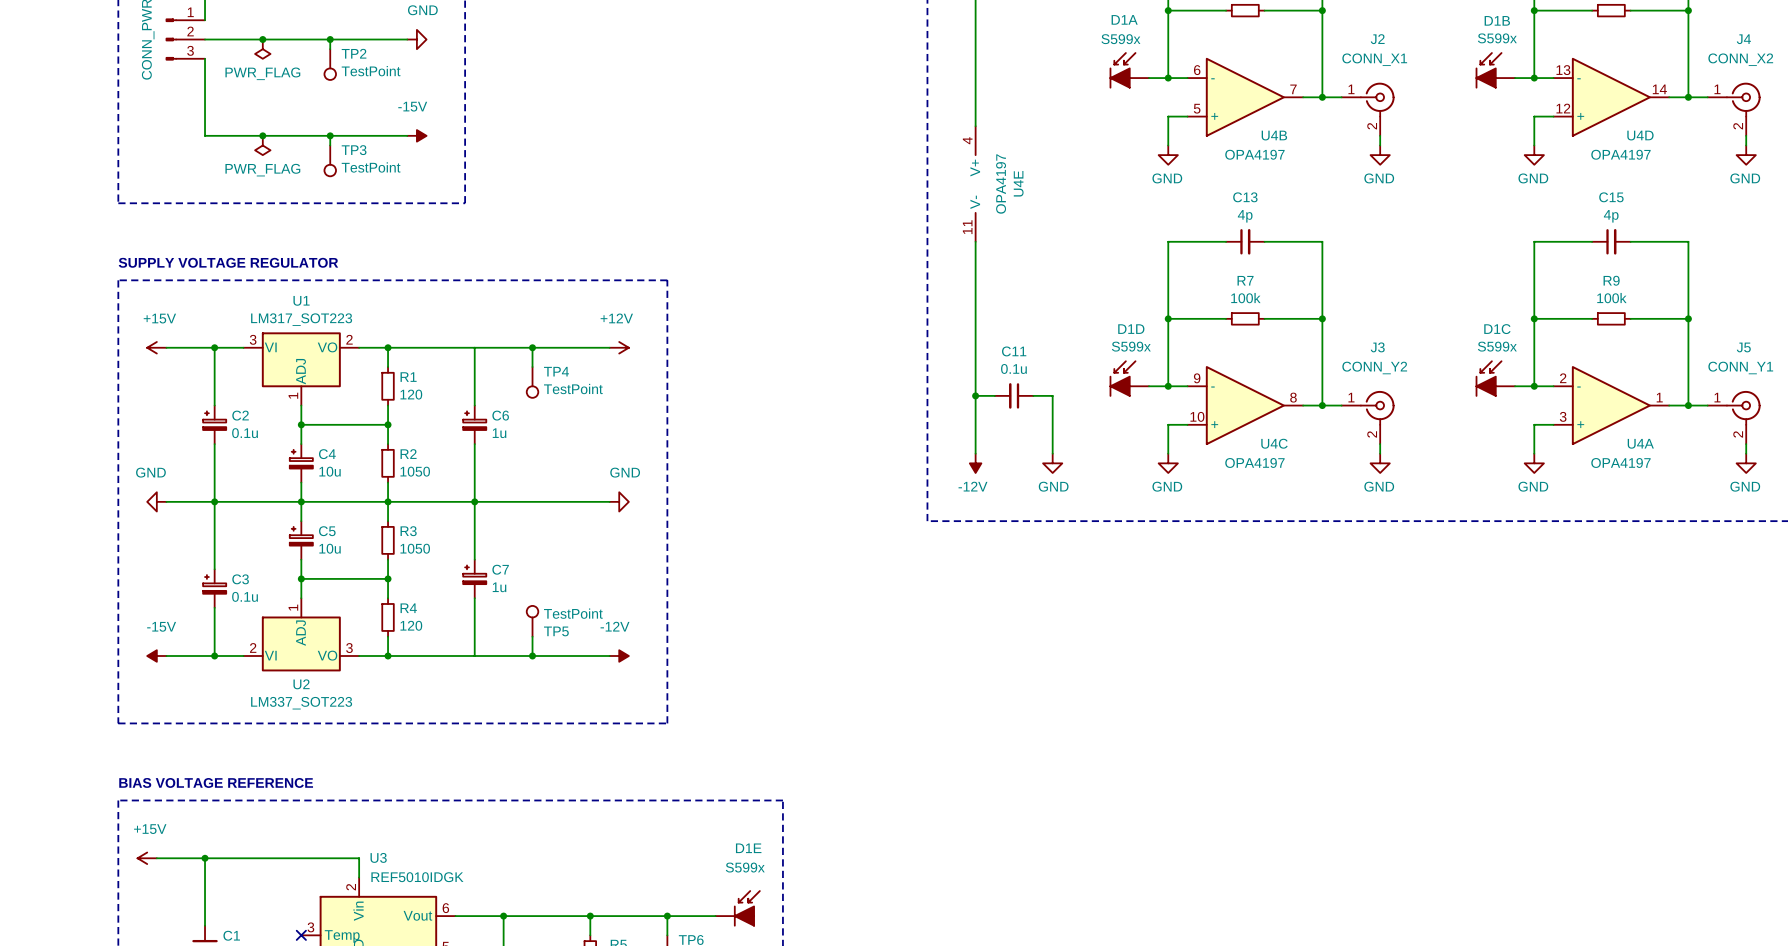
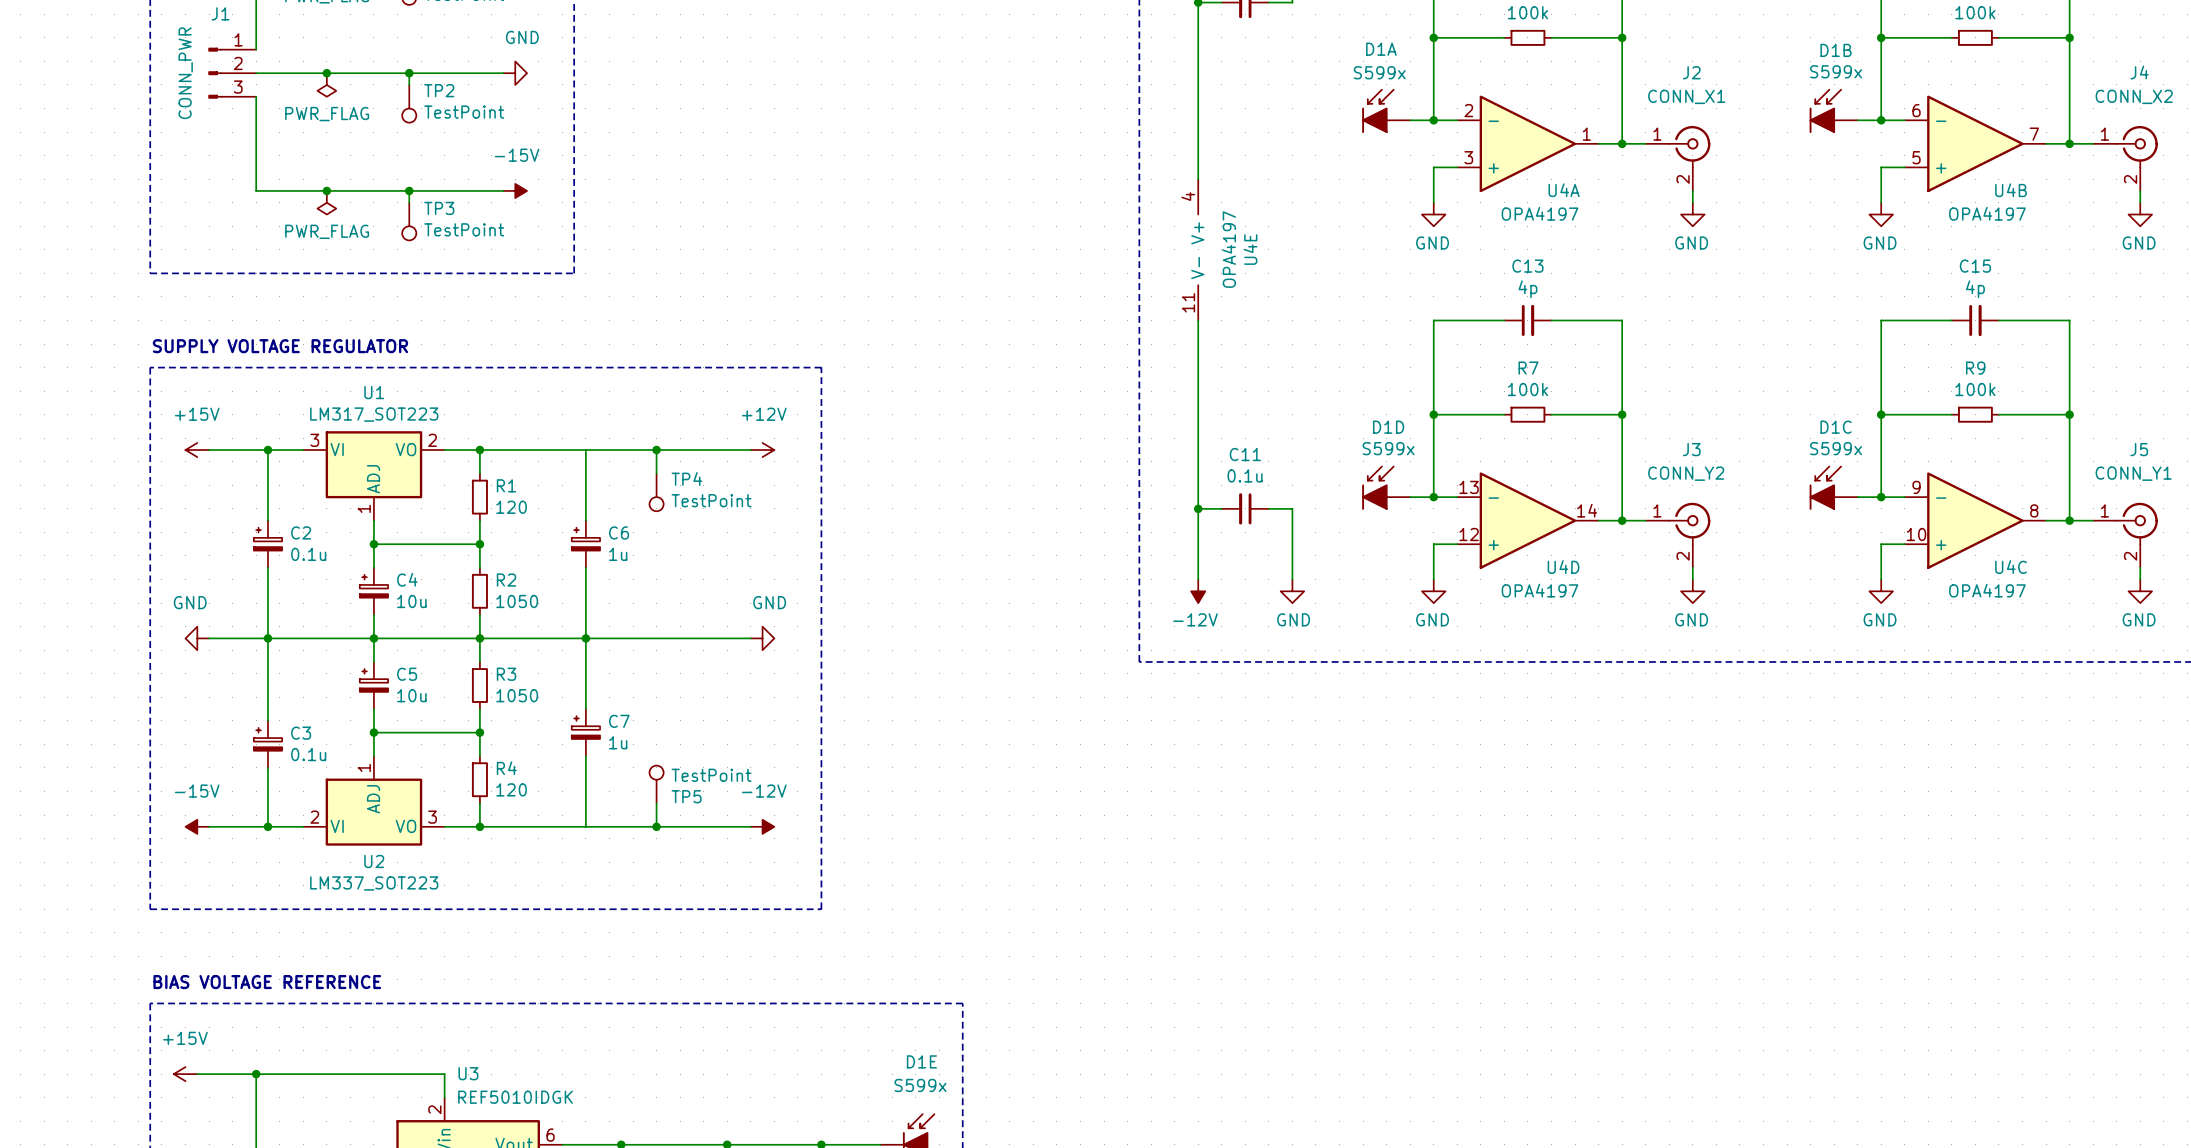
U4B position: (1245, 97) -> (1975, 143)
U4D position: (1611, 97) -> (1527, 520)
U4C position: (1245, 405) -> (1975, 520)
U4A position: (1611, 405) -> (1527, 143)

